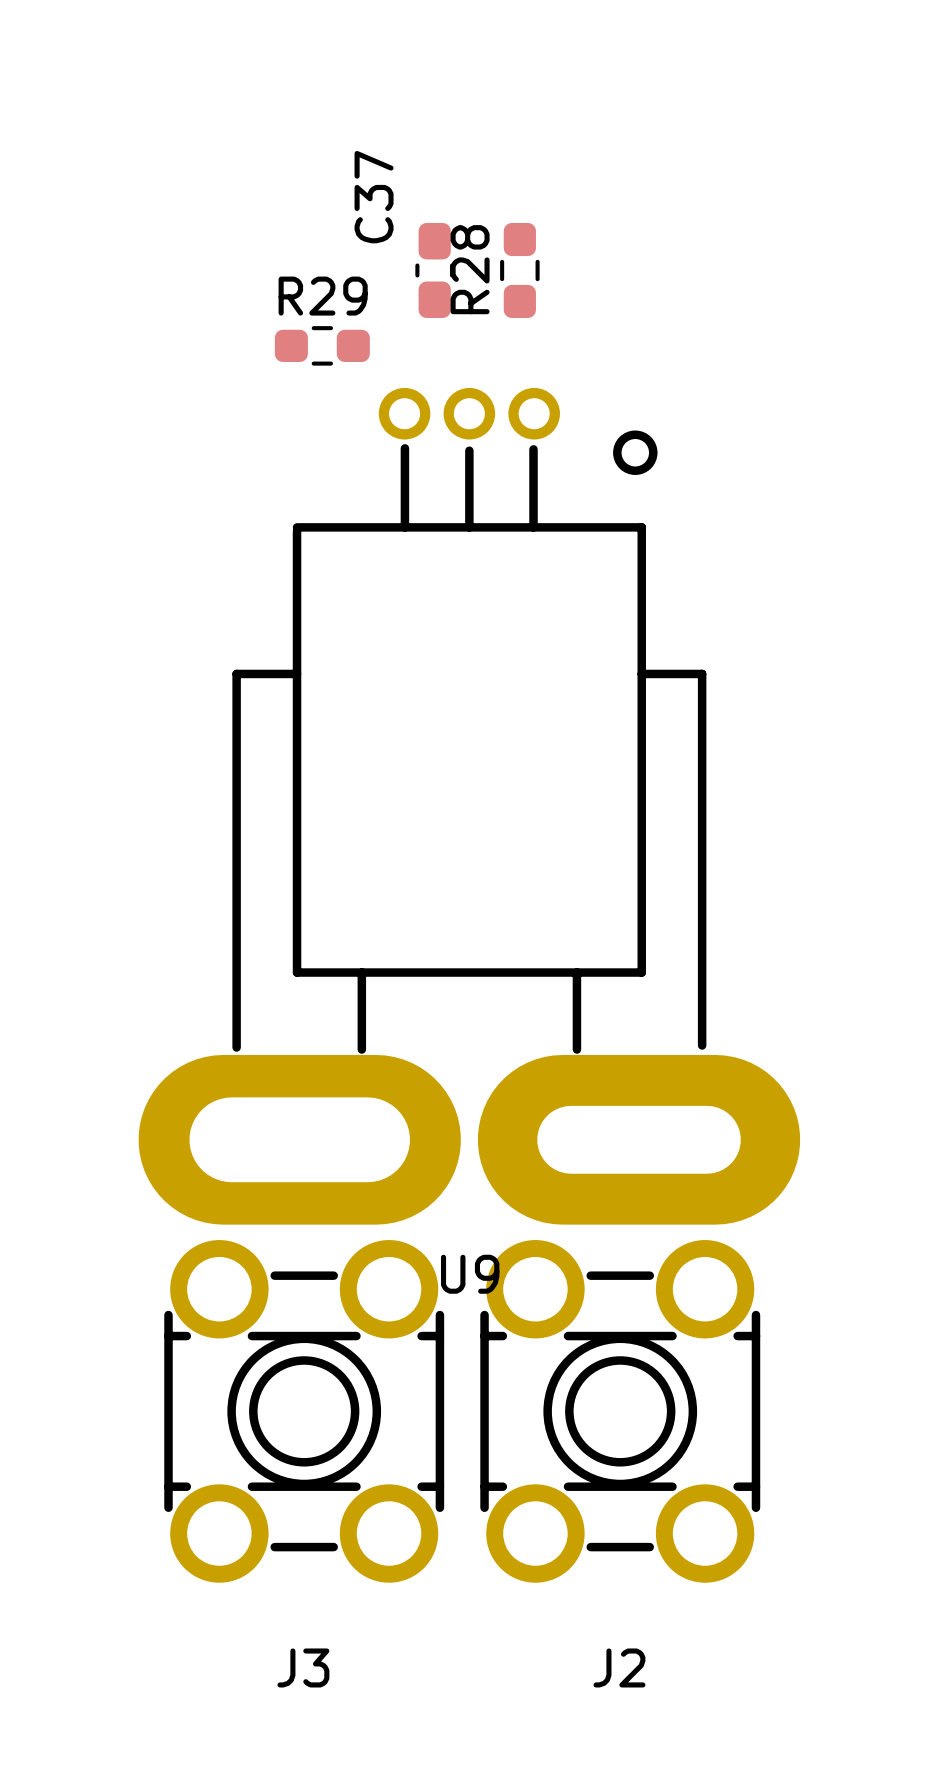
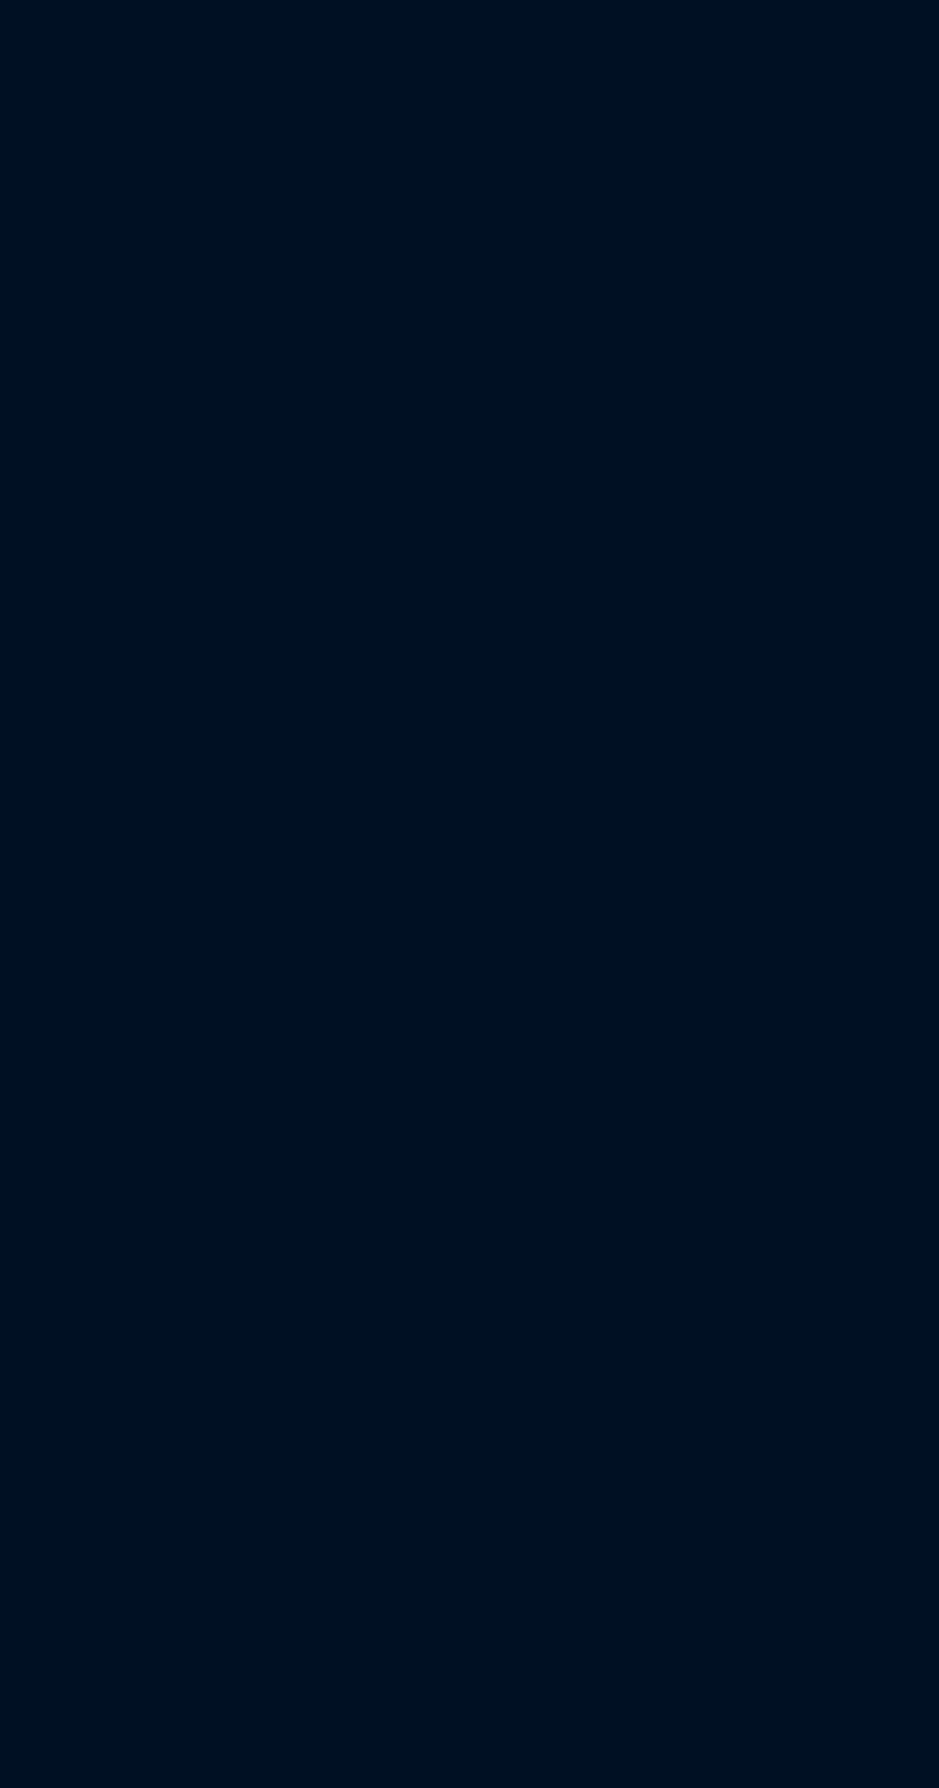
C37: (434, 270) -> none
R28: (519, 270) -> none
R29: (322, 345) -> none
U9: (469, 806) -> none
J3: (304, 1411) -> none
J2: (620, 1411) -> none

